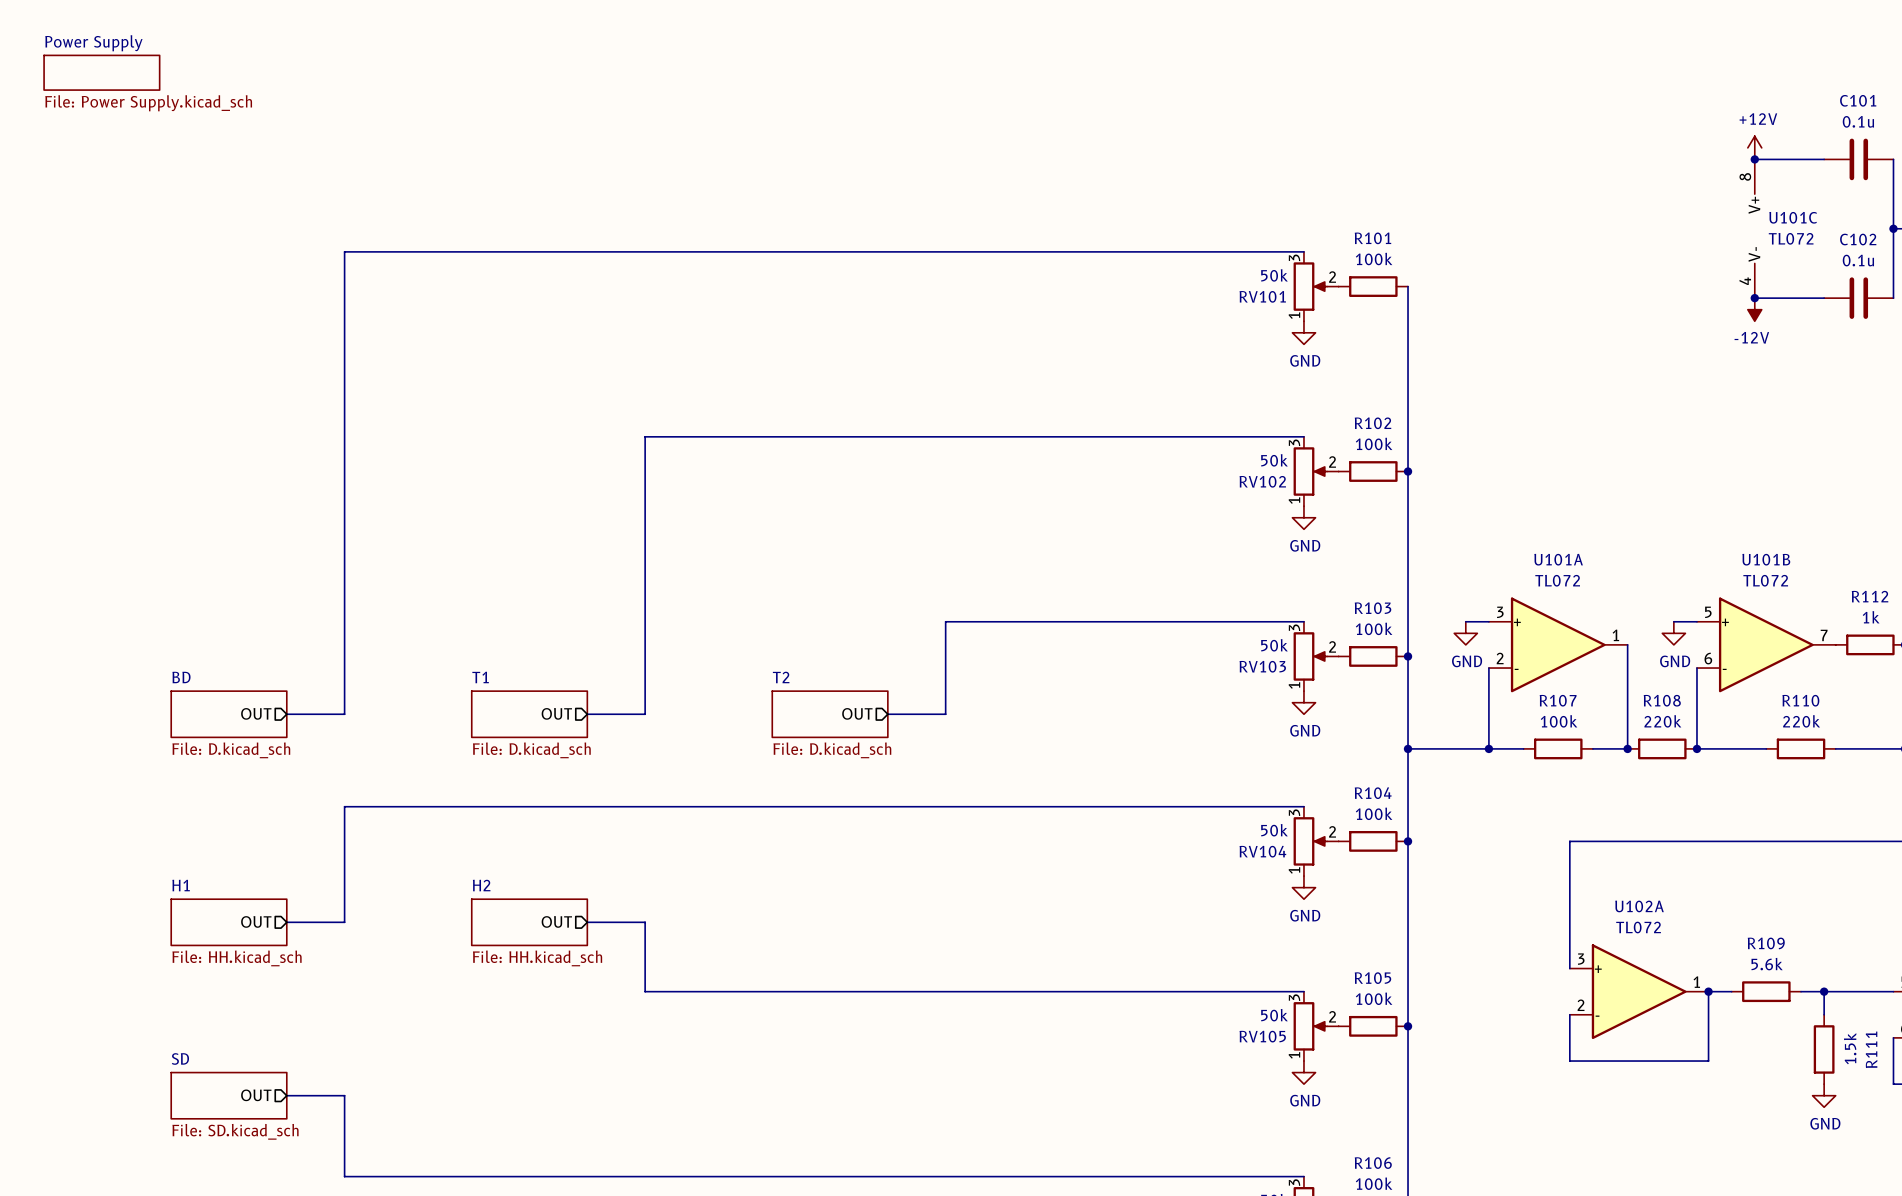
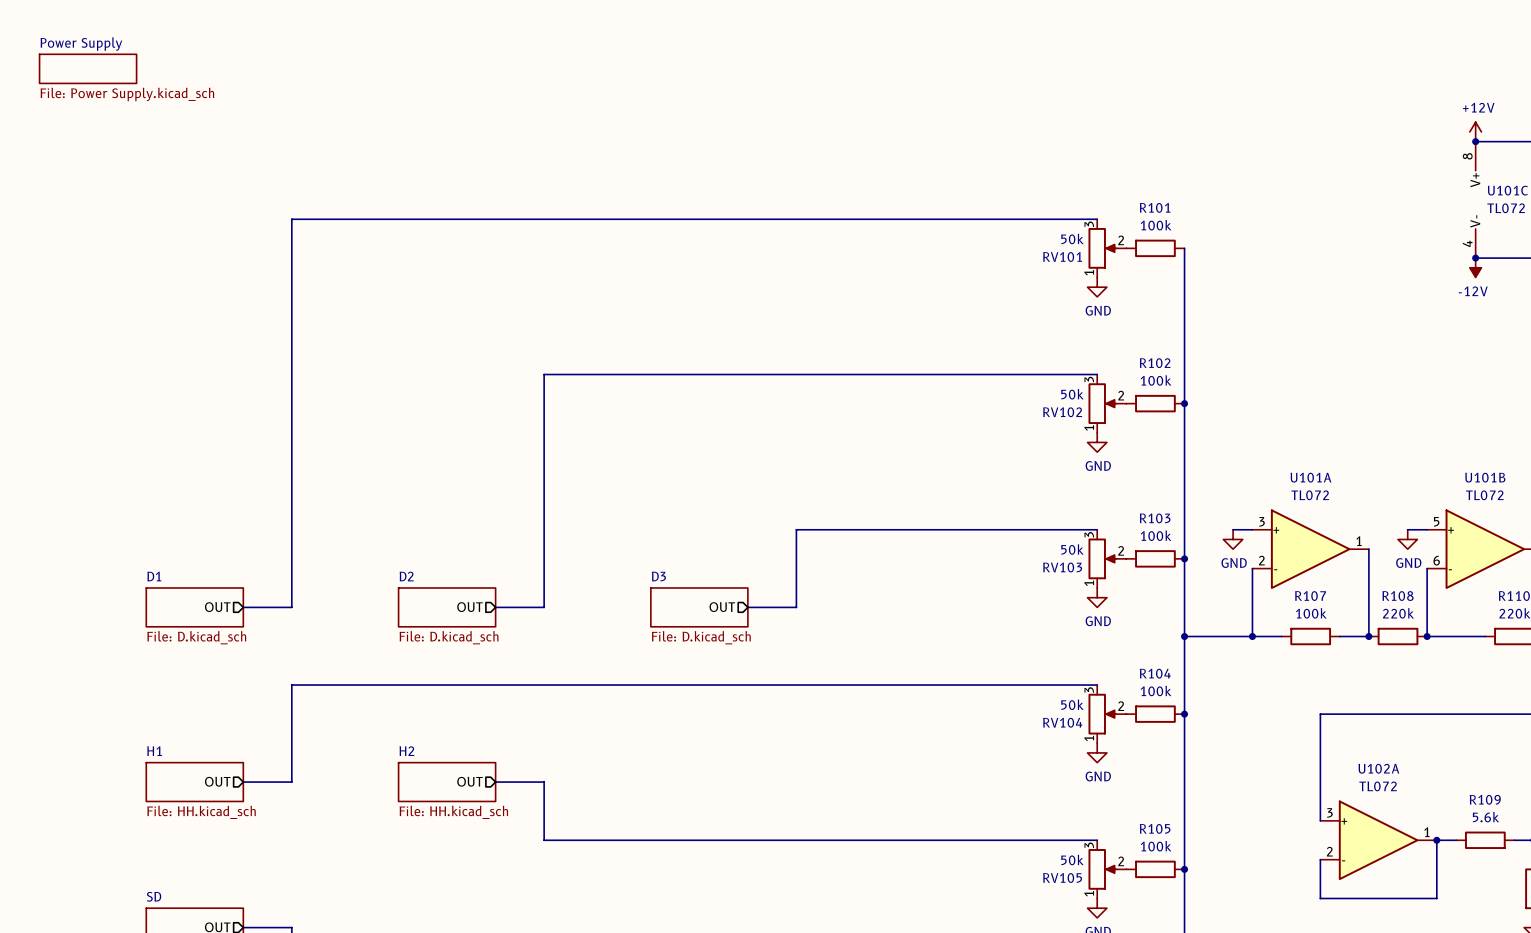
sheet BD name: BD (181, 677) -> D1 (154, 576)
sheet T1 name: T1 (480, 677) -> D2 (406, 576)
sheet T2 name: T2 (781, 677) -> D3 (658, 576)

